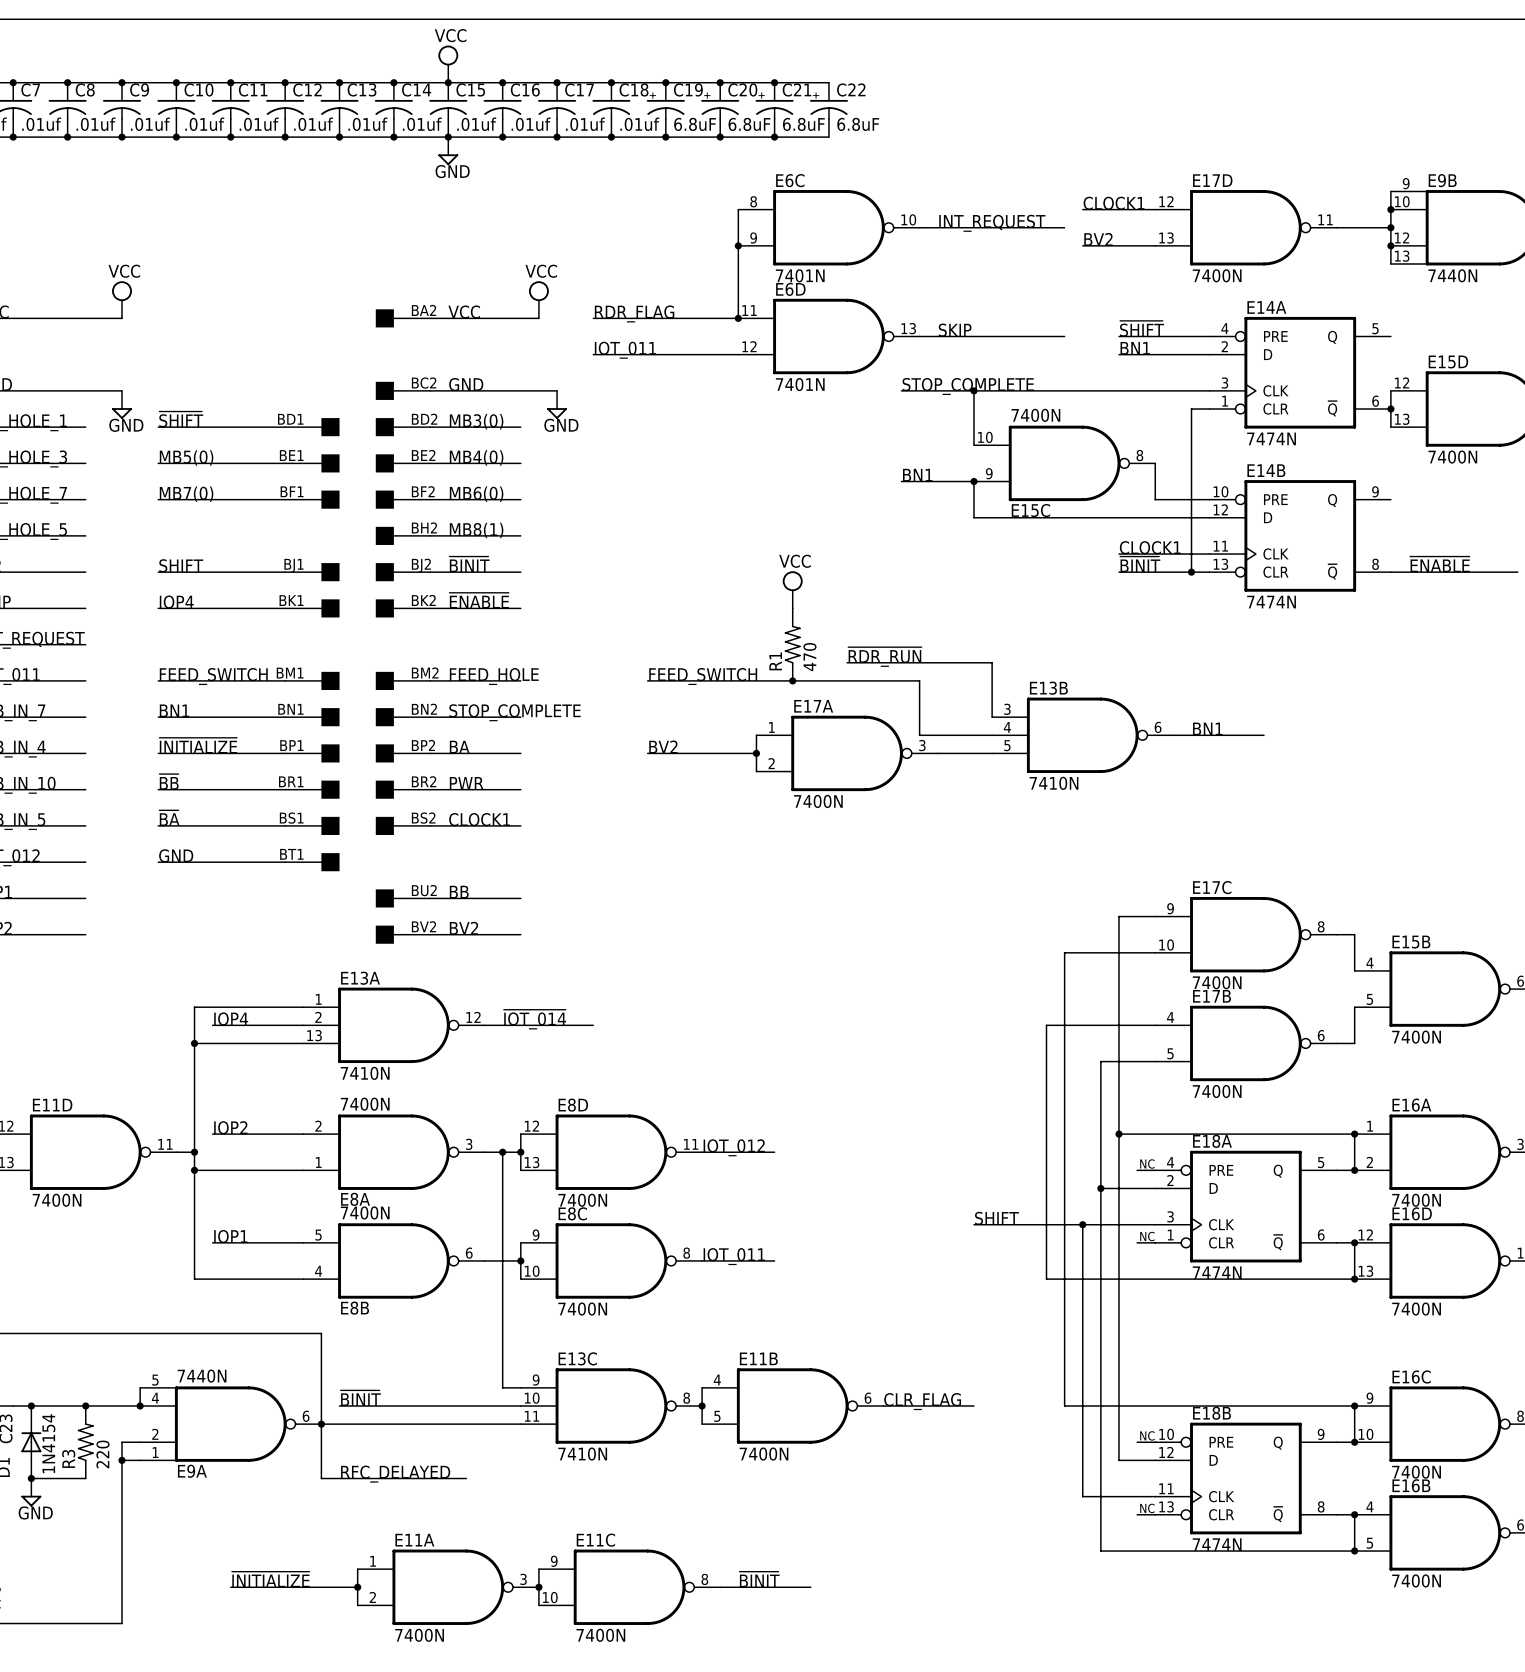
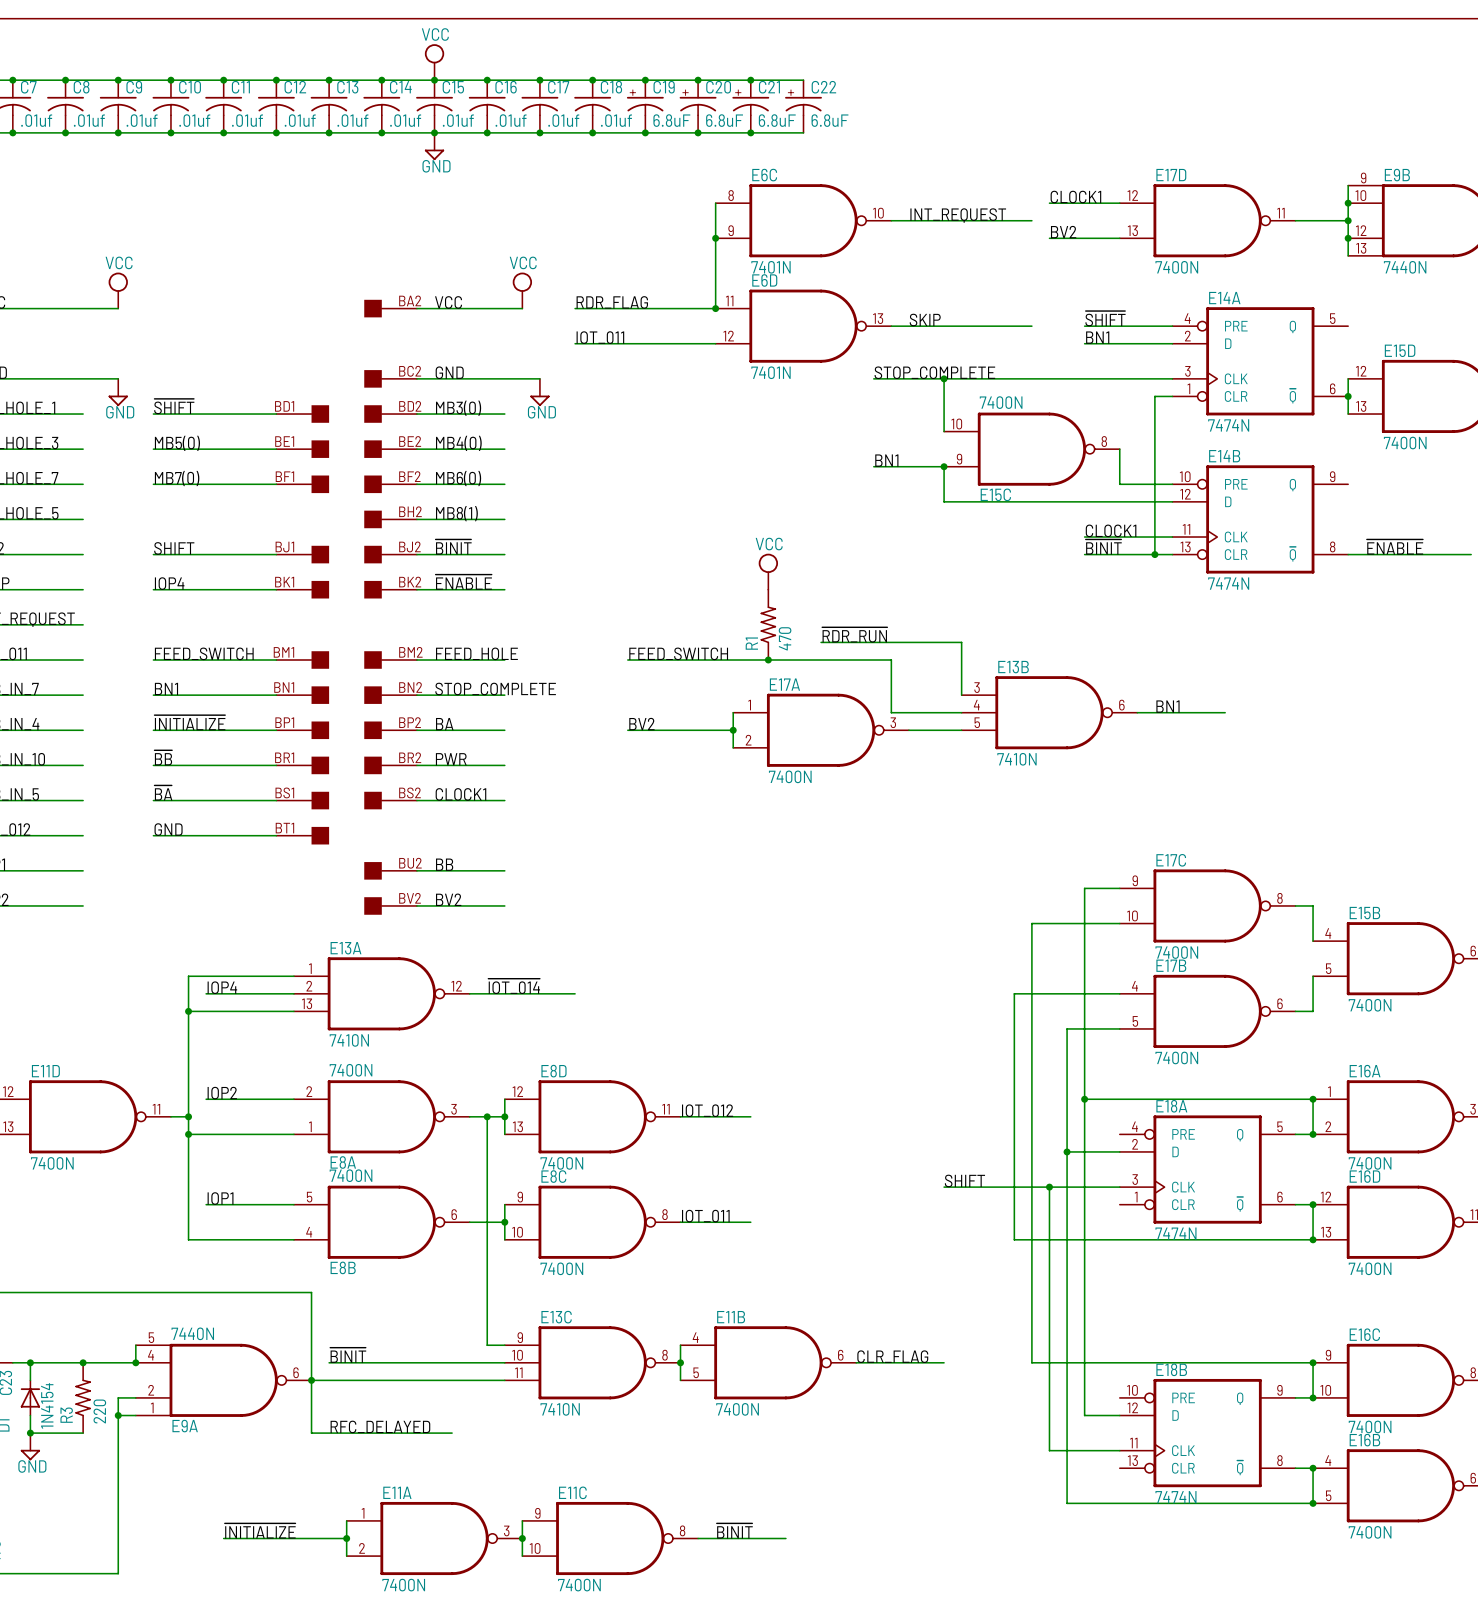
power symbol: (1146, 1170) -> none
power symbol: (1146, 1242) -> none
power symbol: (1146, 1442) -> none
power symbol: (1146, 1514) -> none

